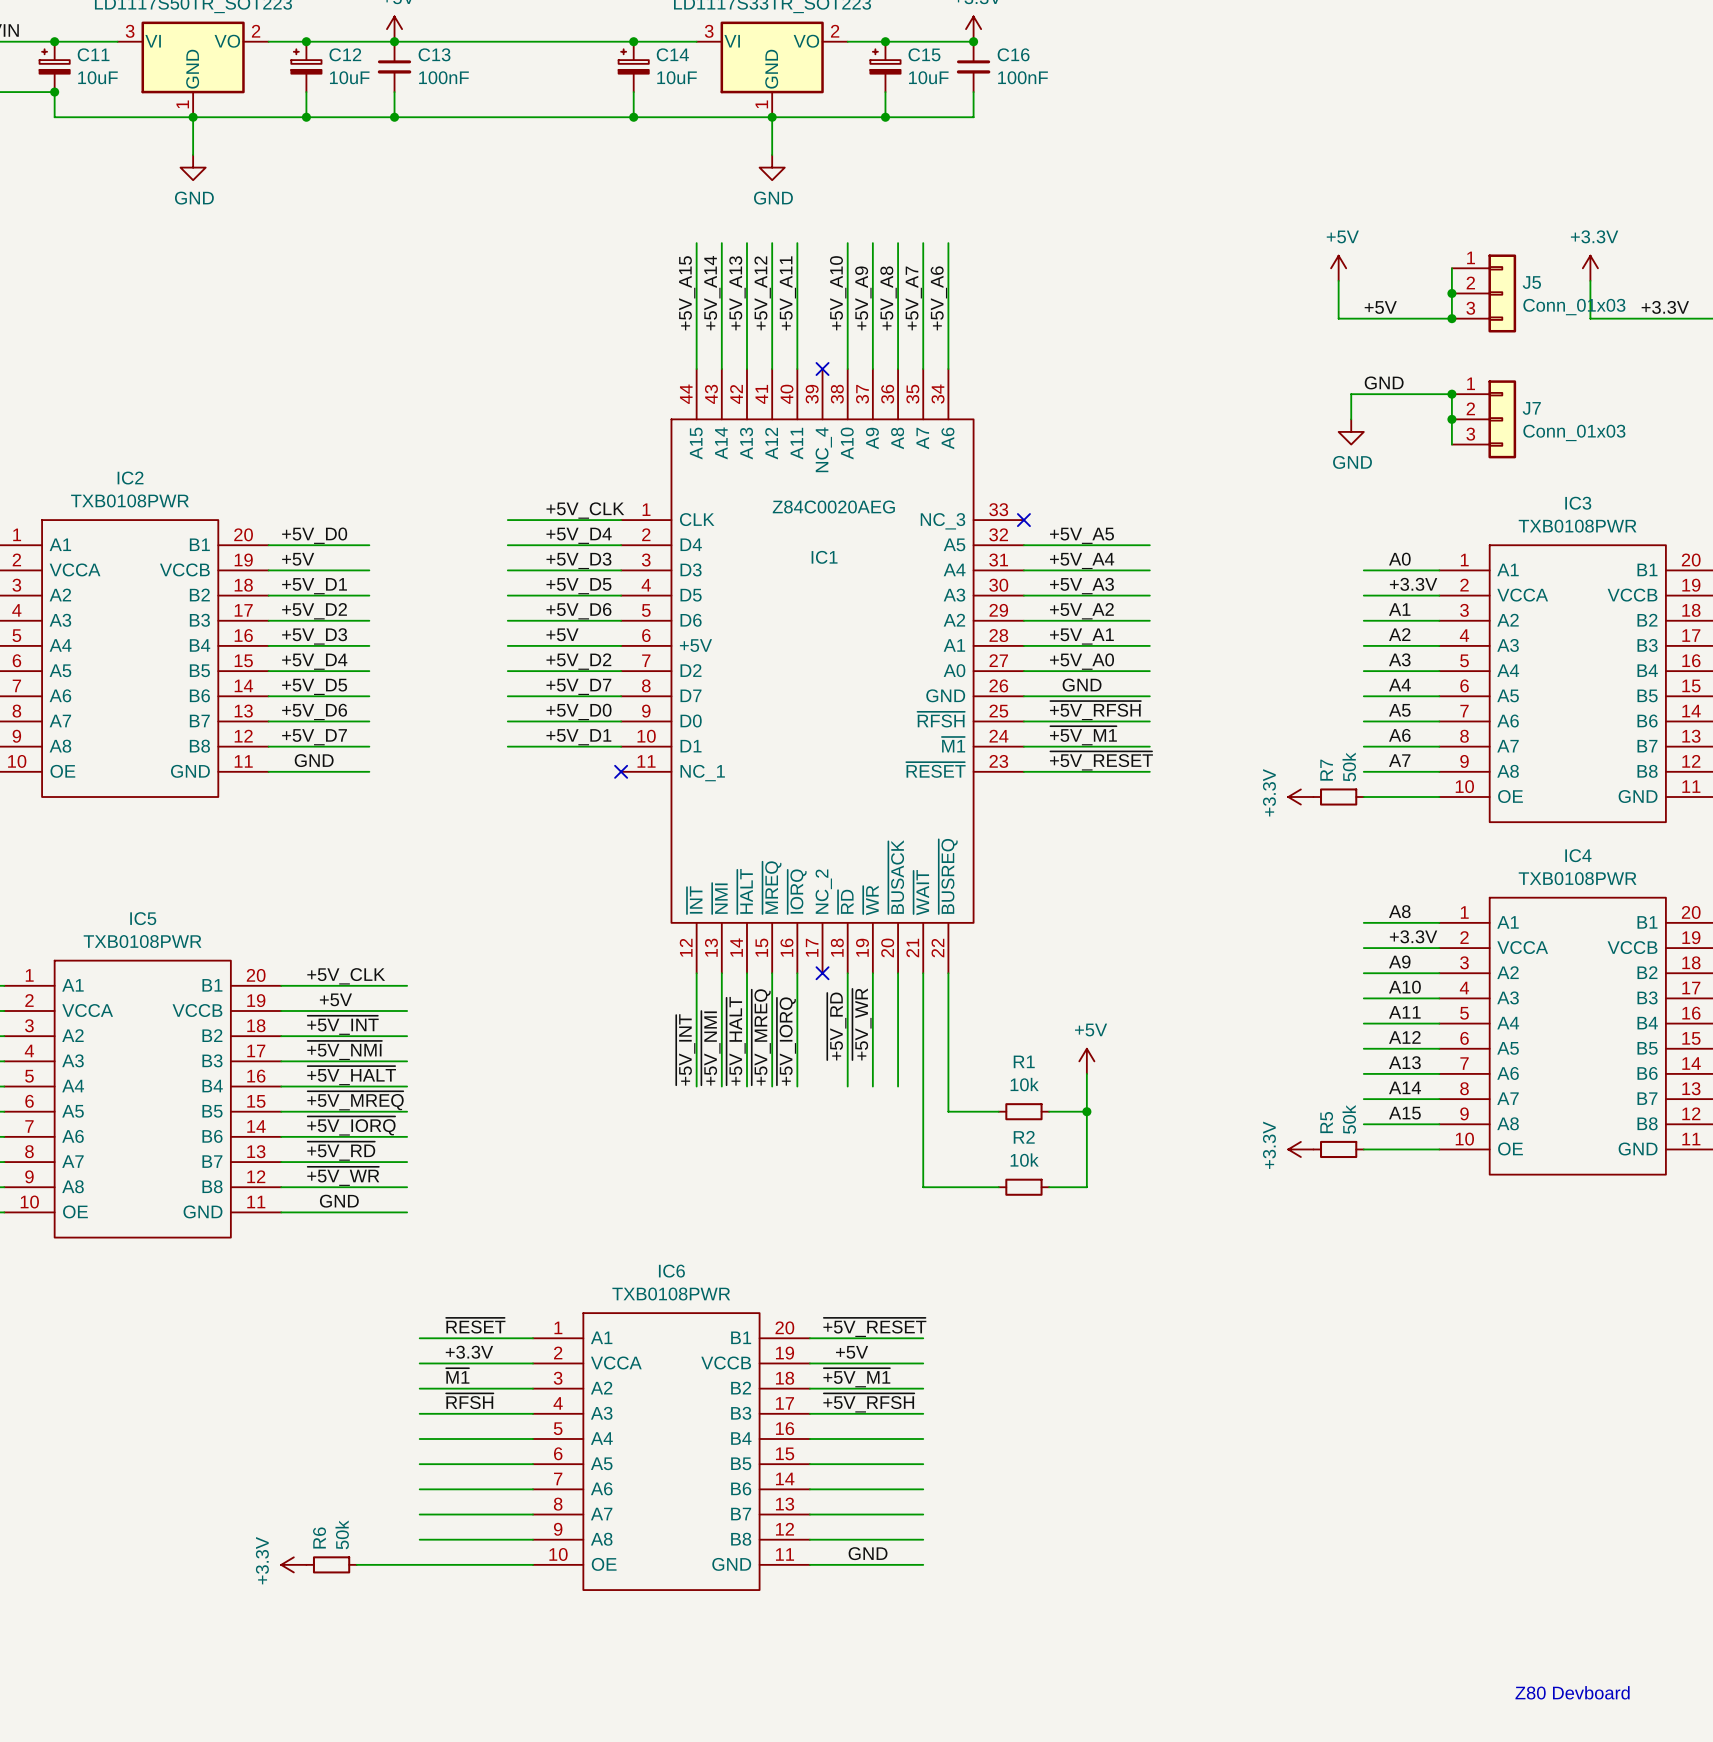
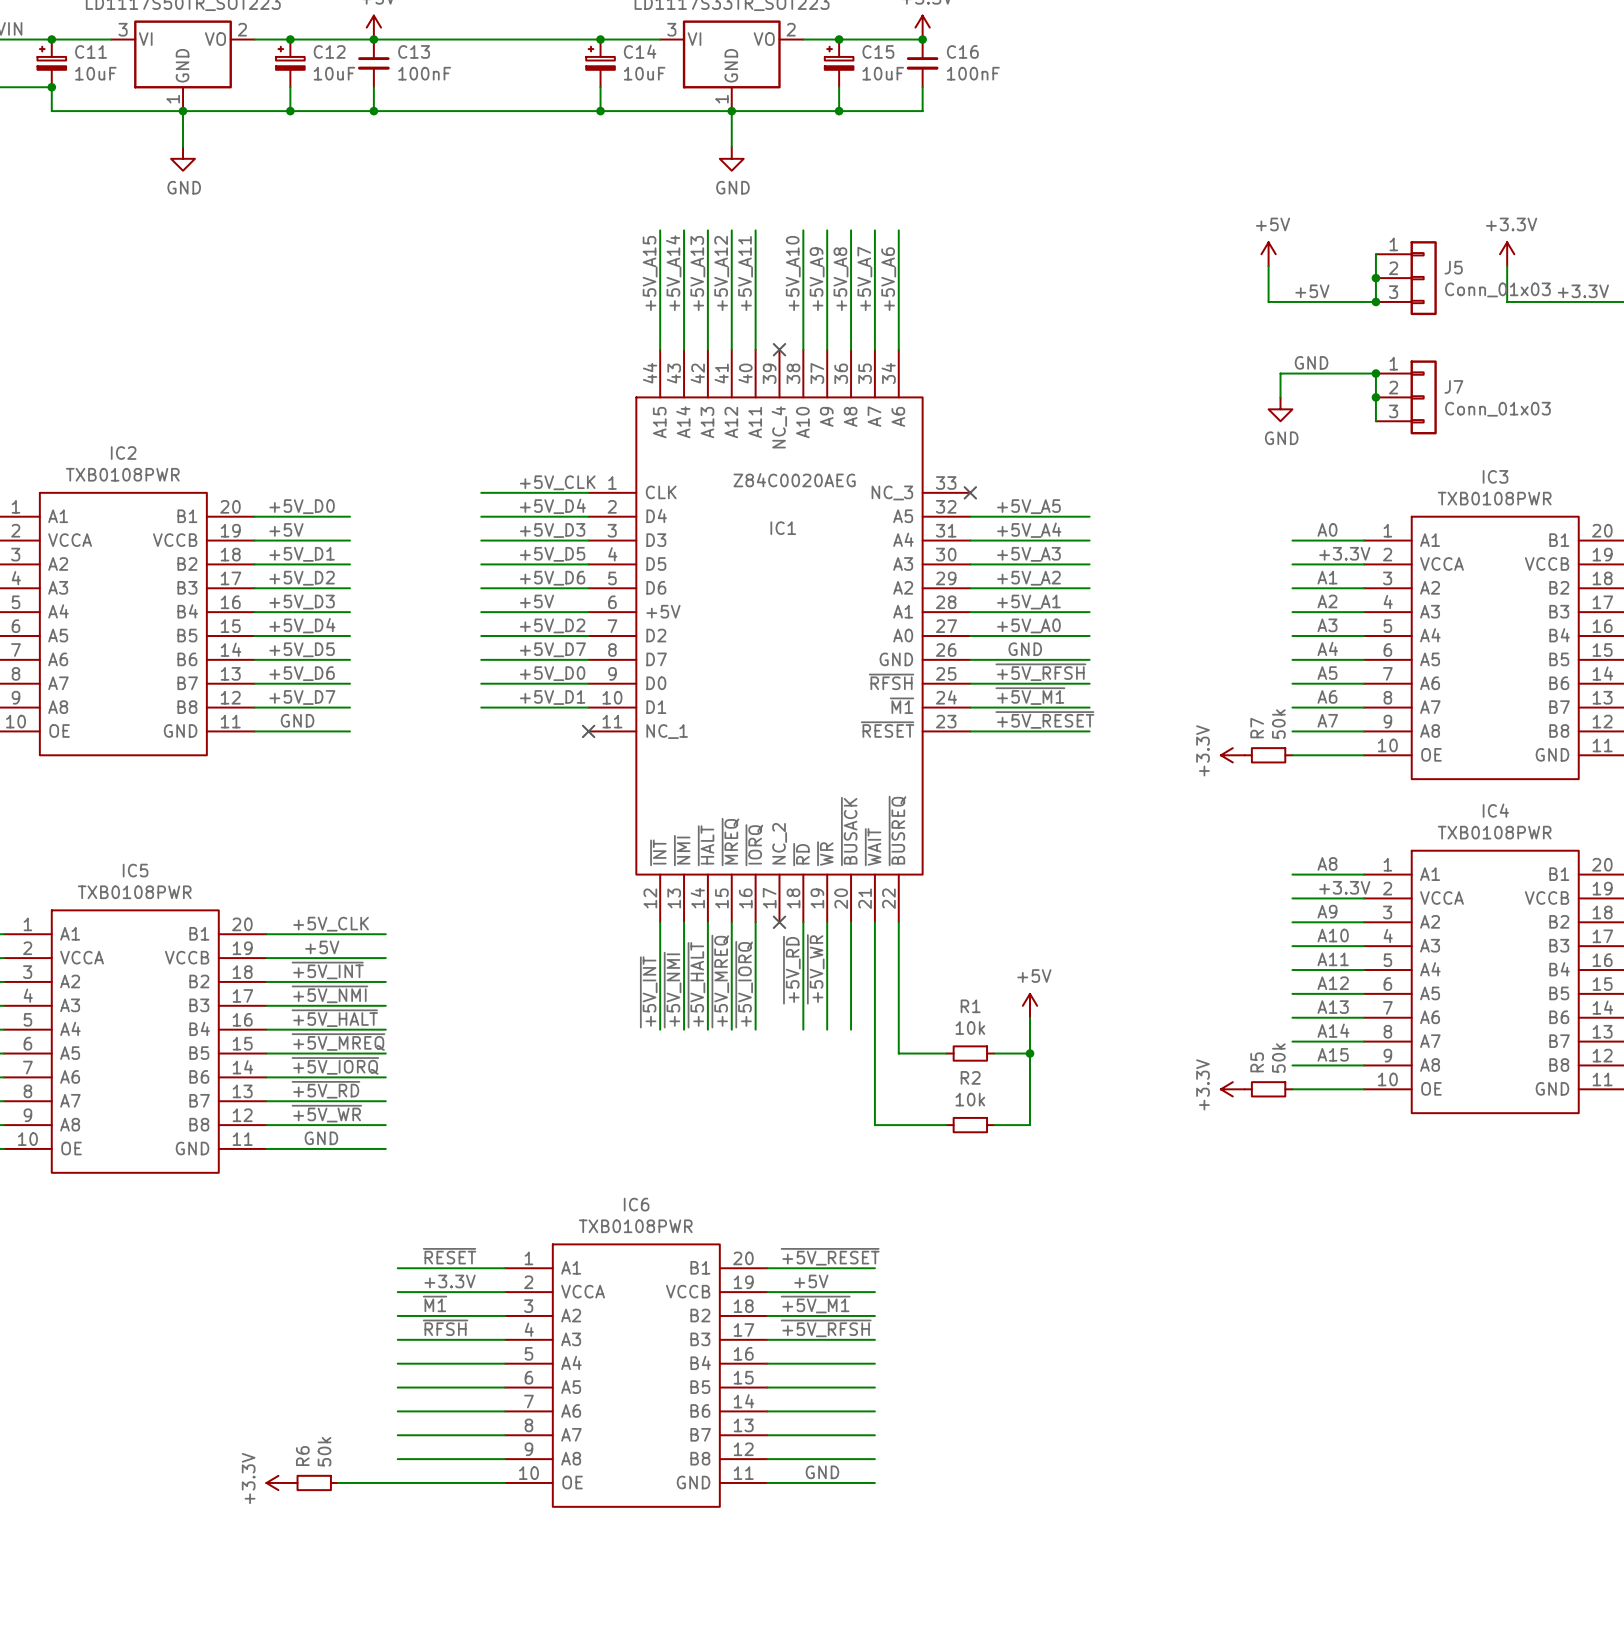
text: Z80 Devboard (1572, 1692) -> none

